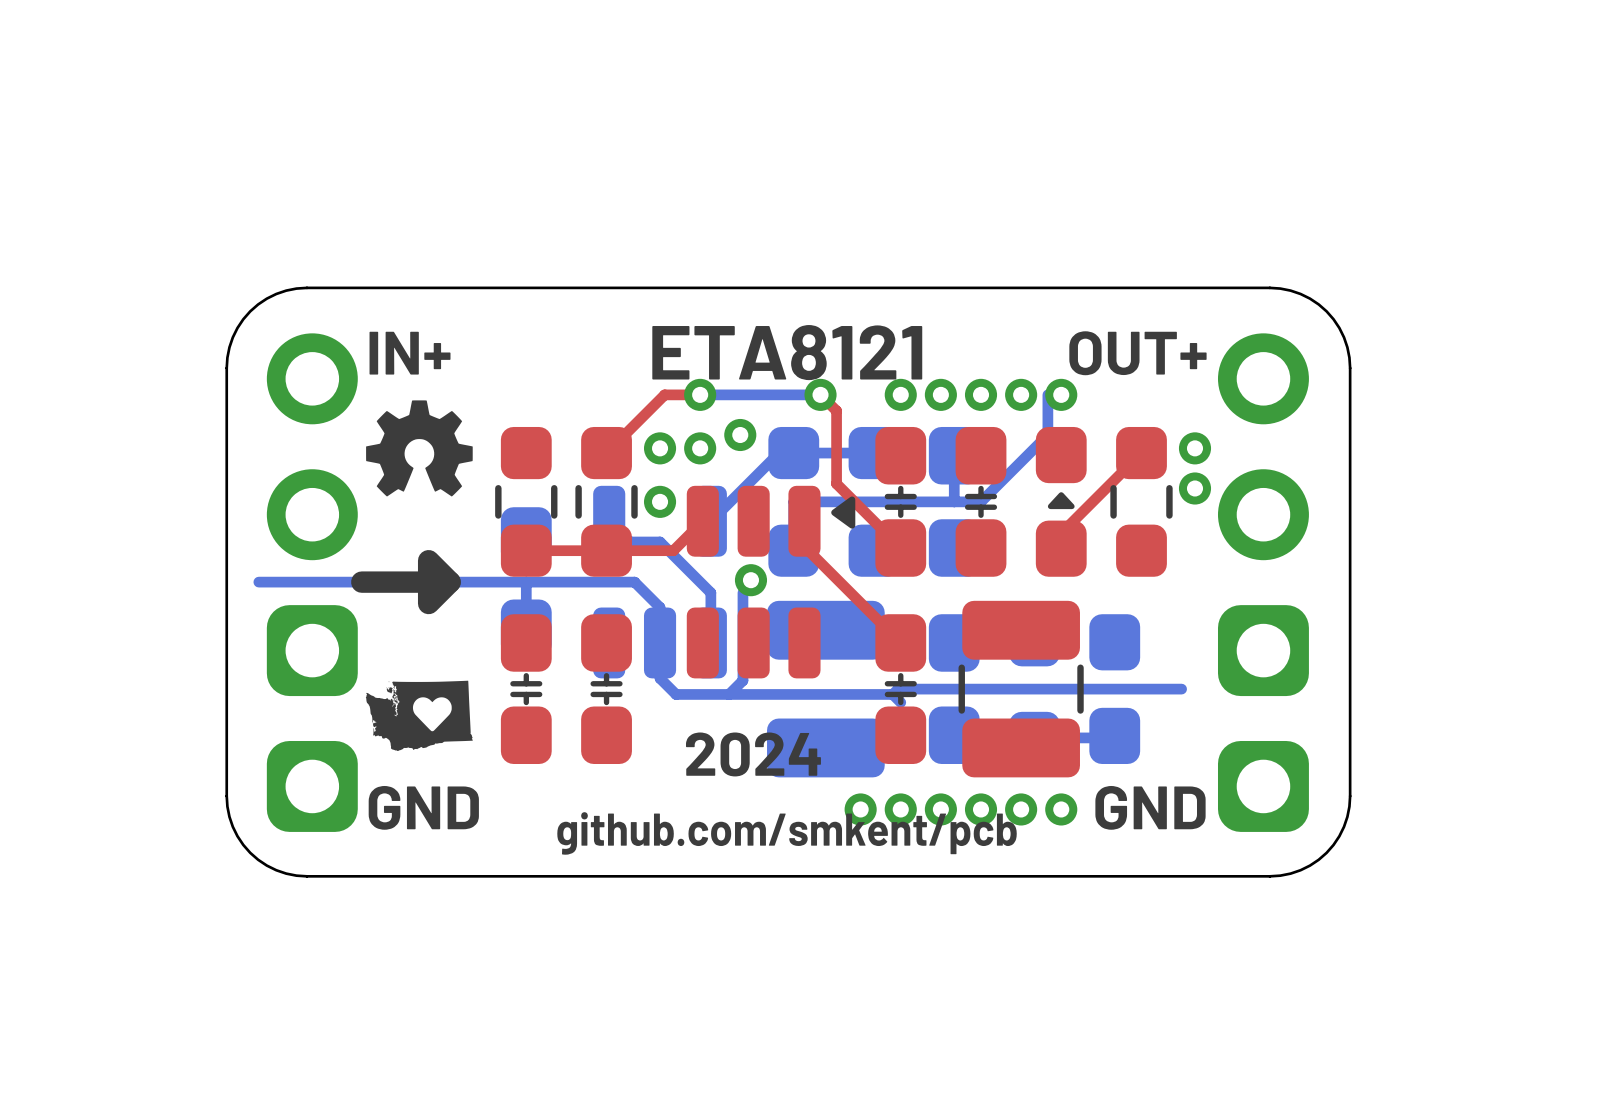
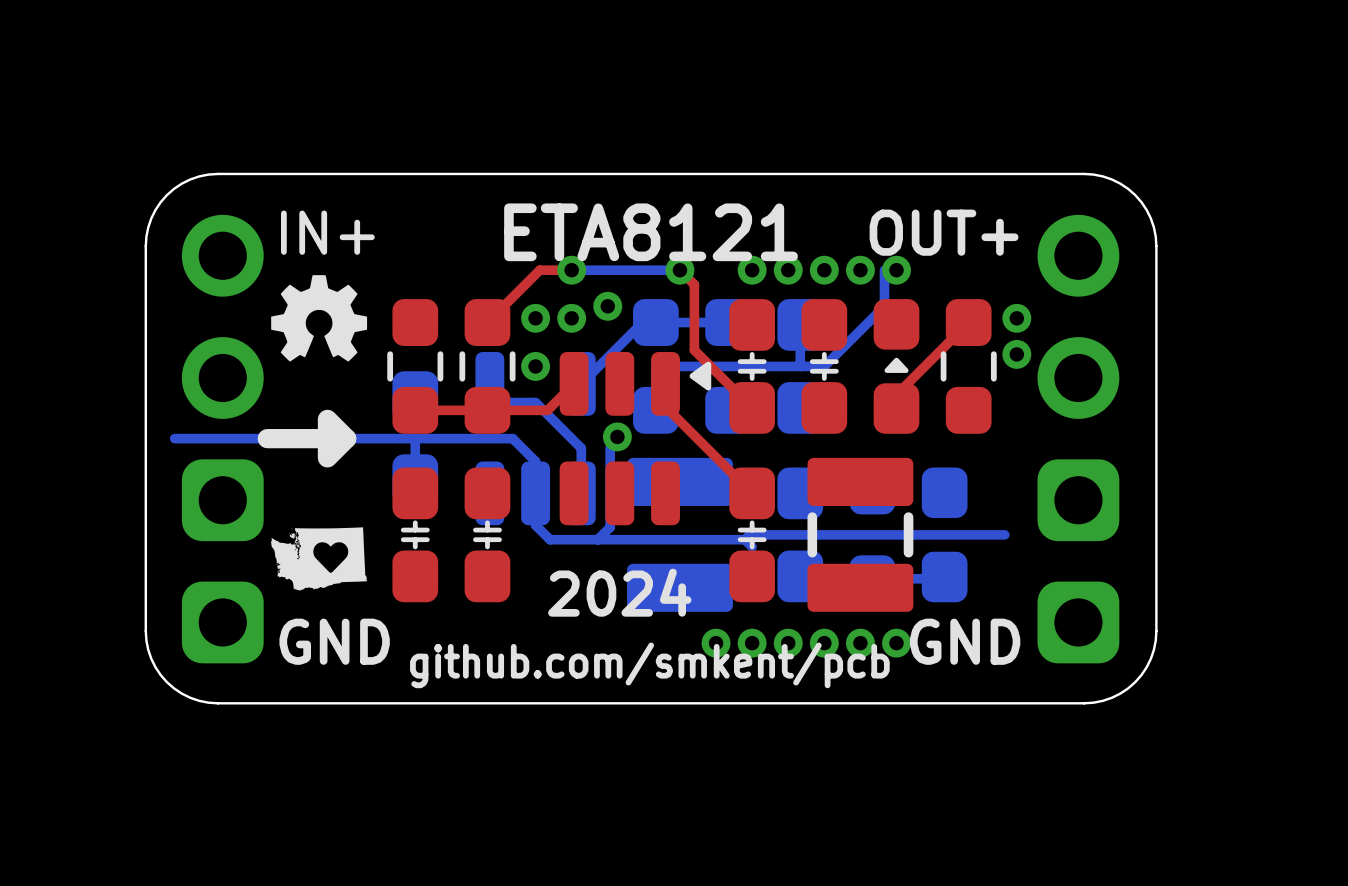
part footprint: [767, 600, 885, 778] -> [627, 457, 733, 612]
part footprint: [958, 600, 1084, 778] -> [807, 457, 914, 612]

